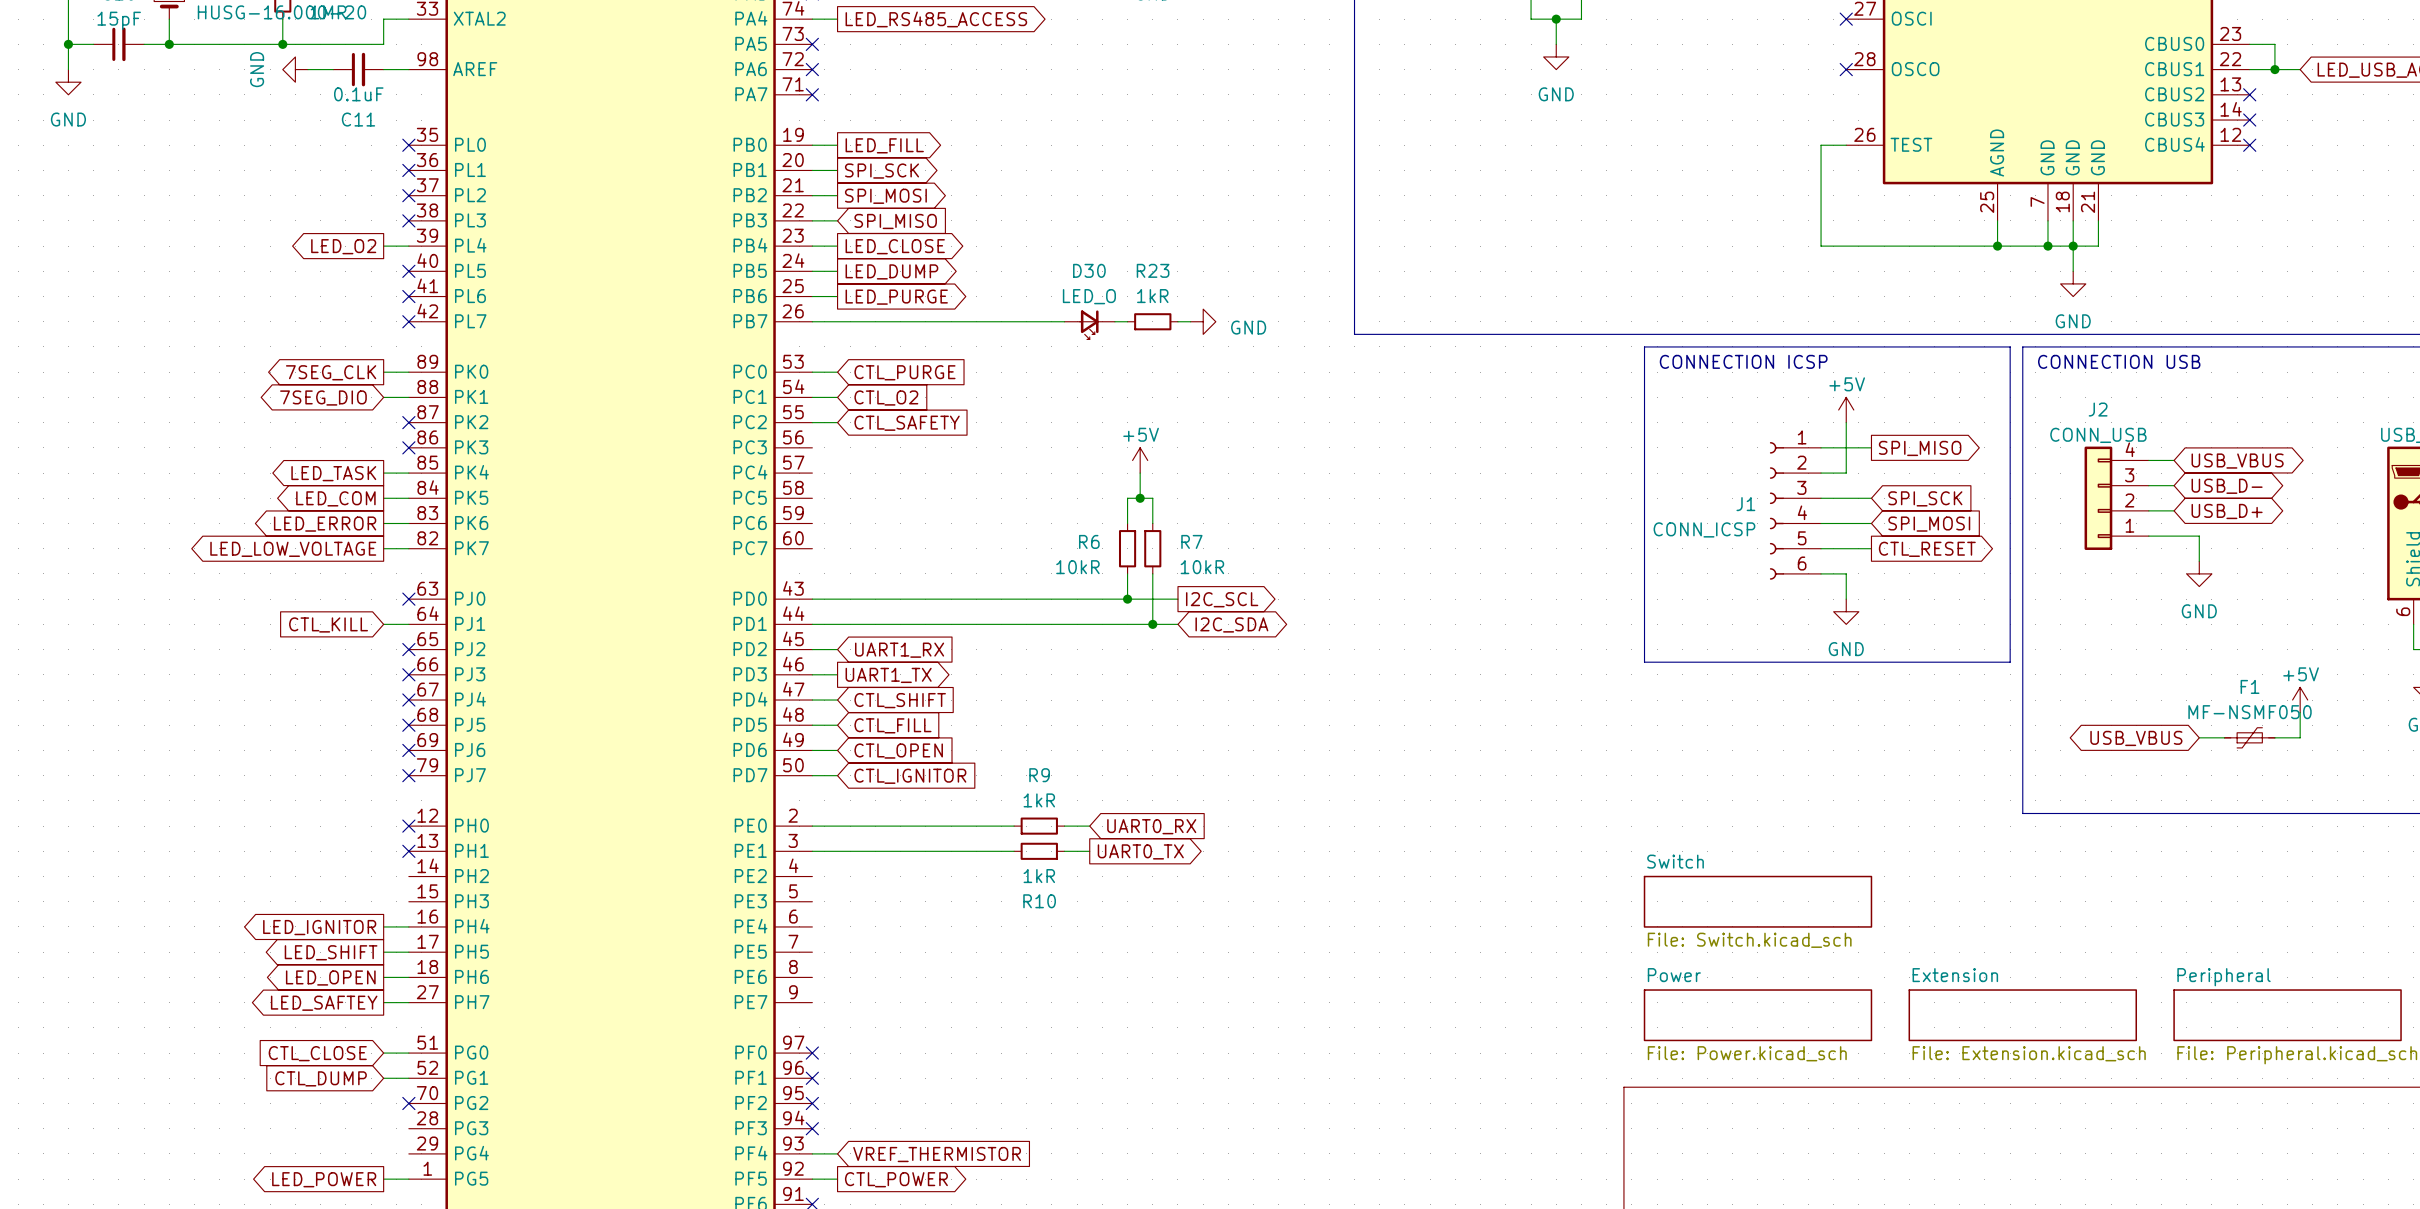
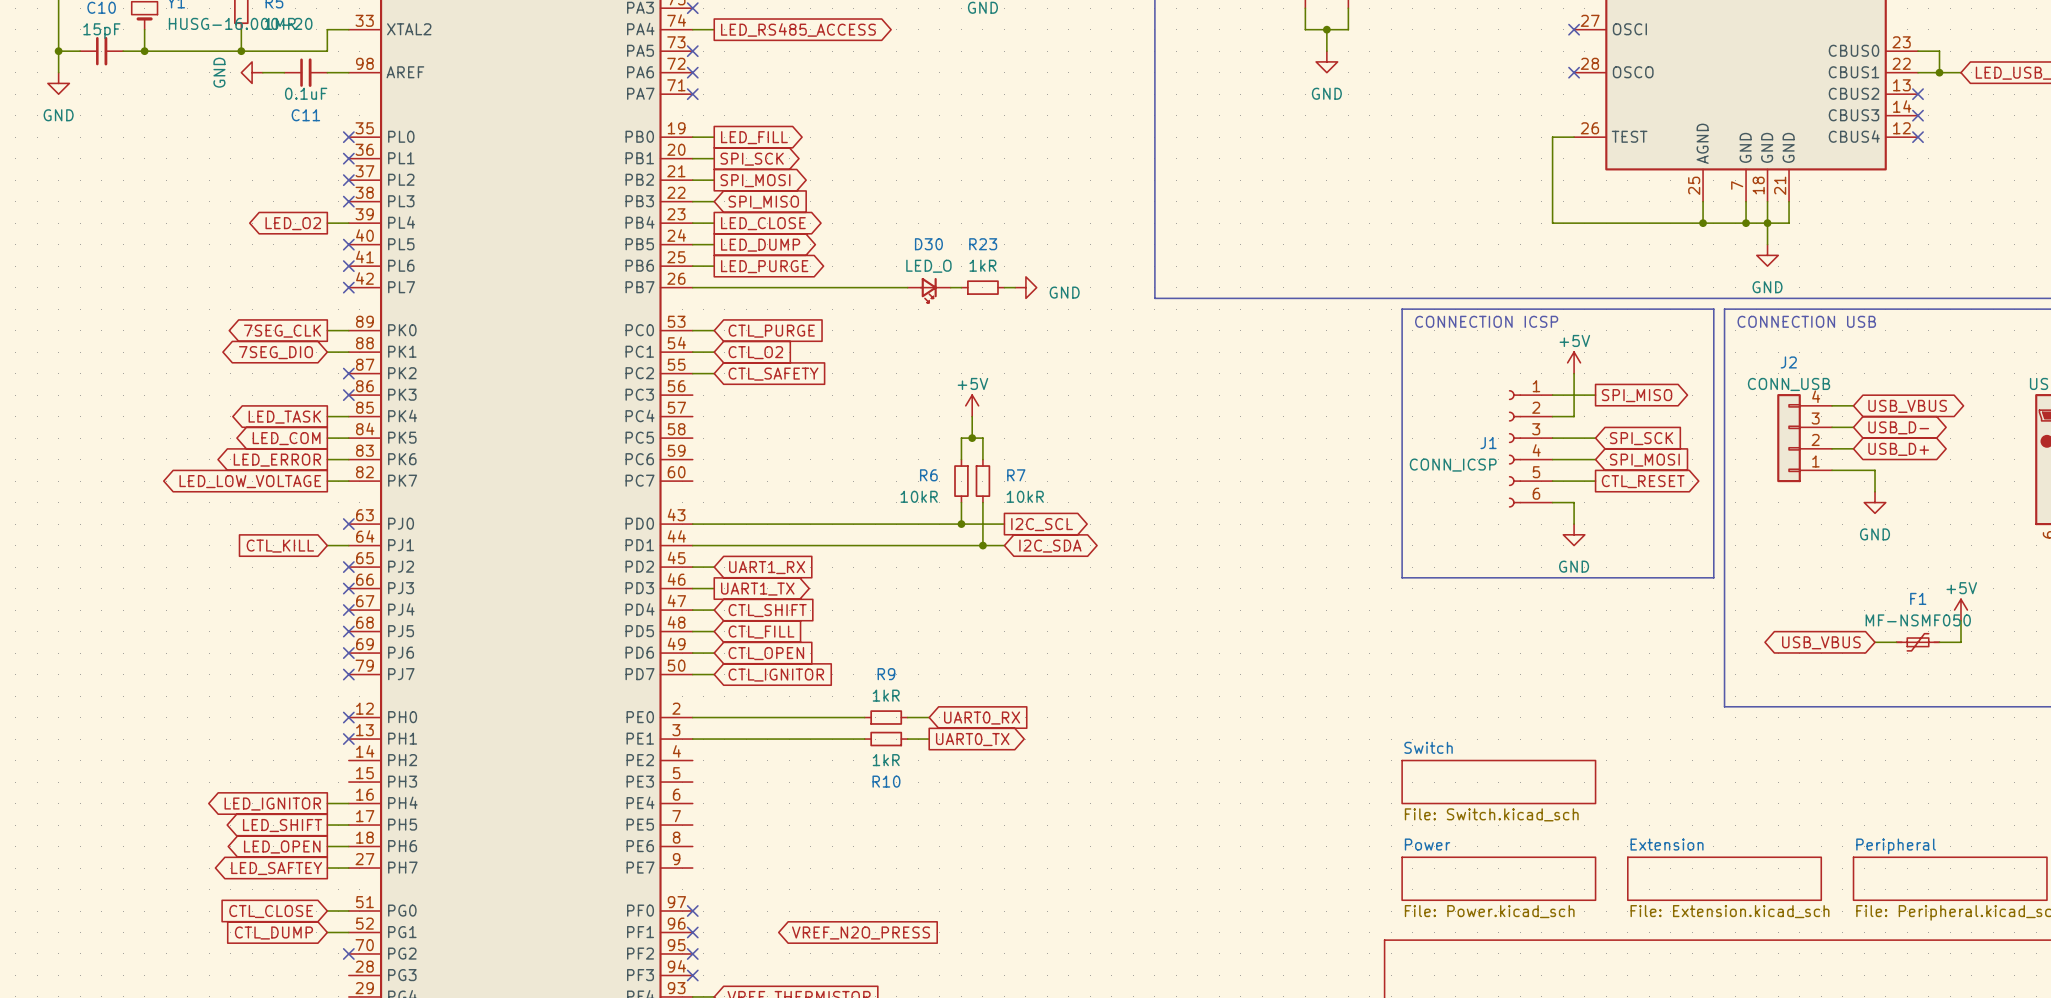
global label: none -> VREF_N2O_PRESS (861, 933)

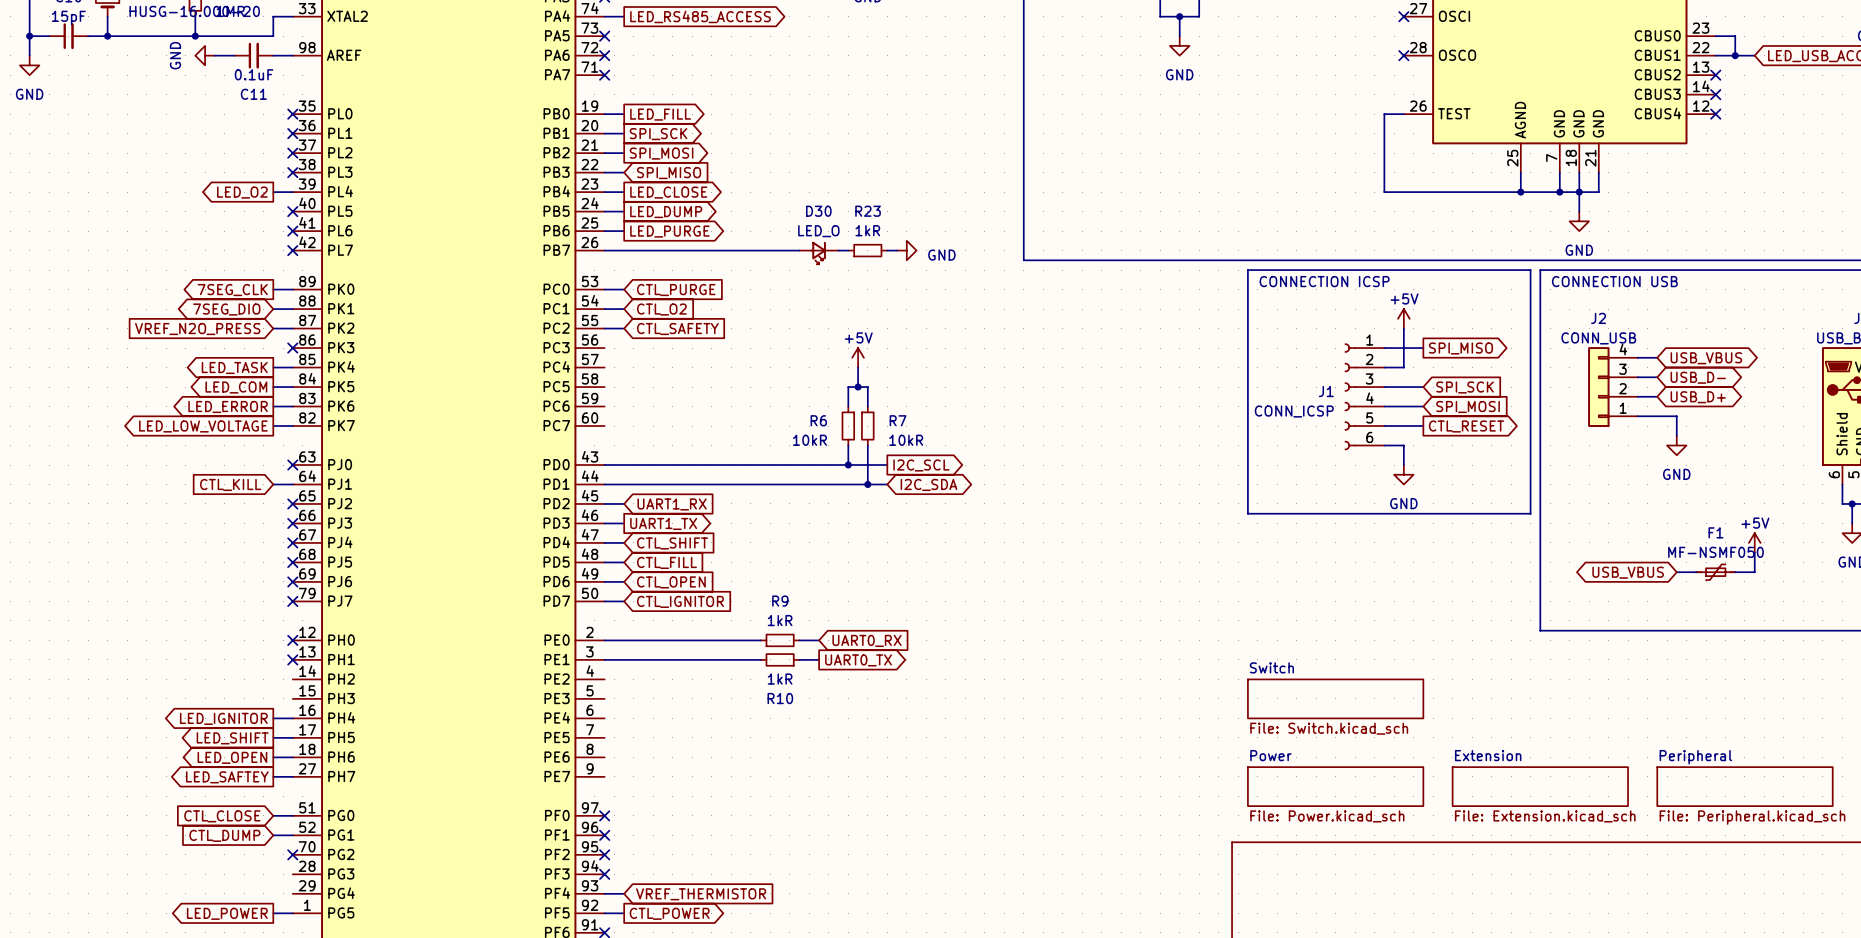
wire: none -> (273, 328) (292, 328)
no-connect mark: (348, 373) -> none
global label: none -> VREF_N2O_PRESS (197, 329)
global label: VREF_N2O_PRESS (861, 933) -> none

